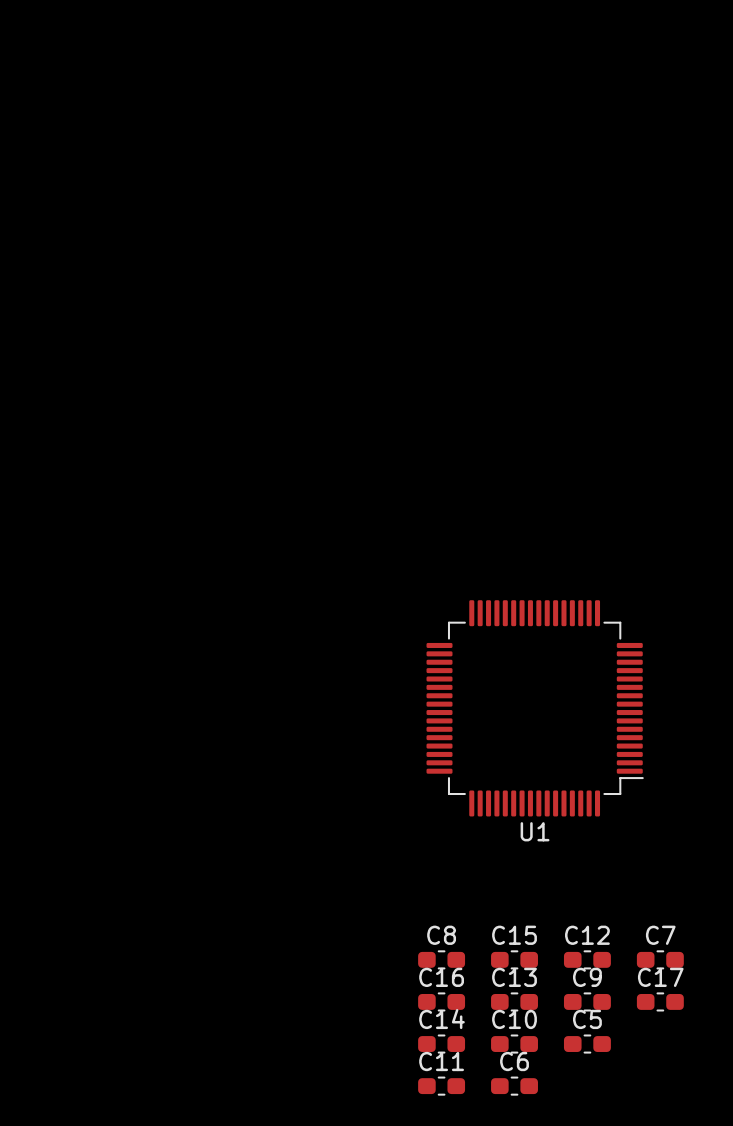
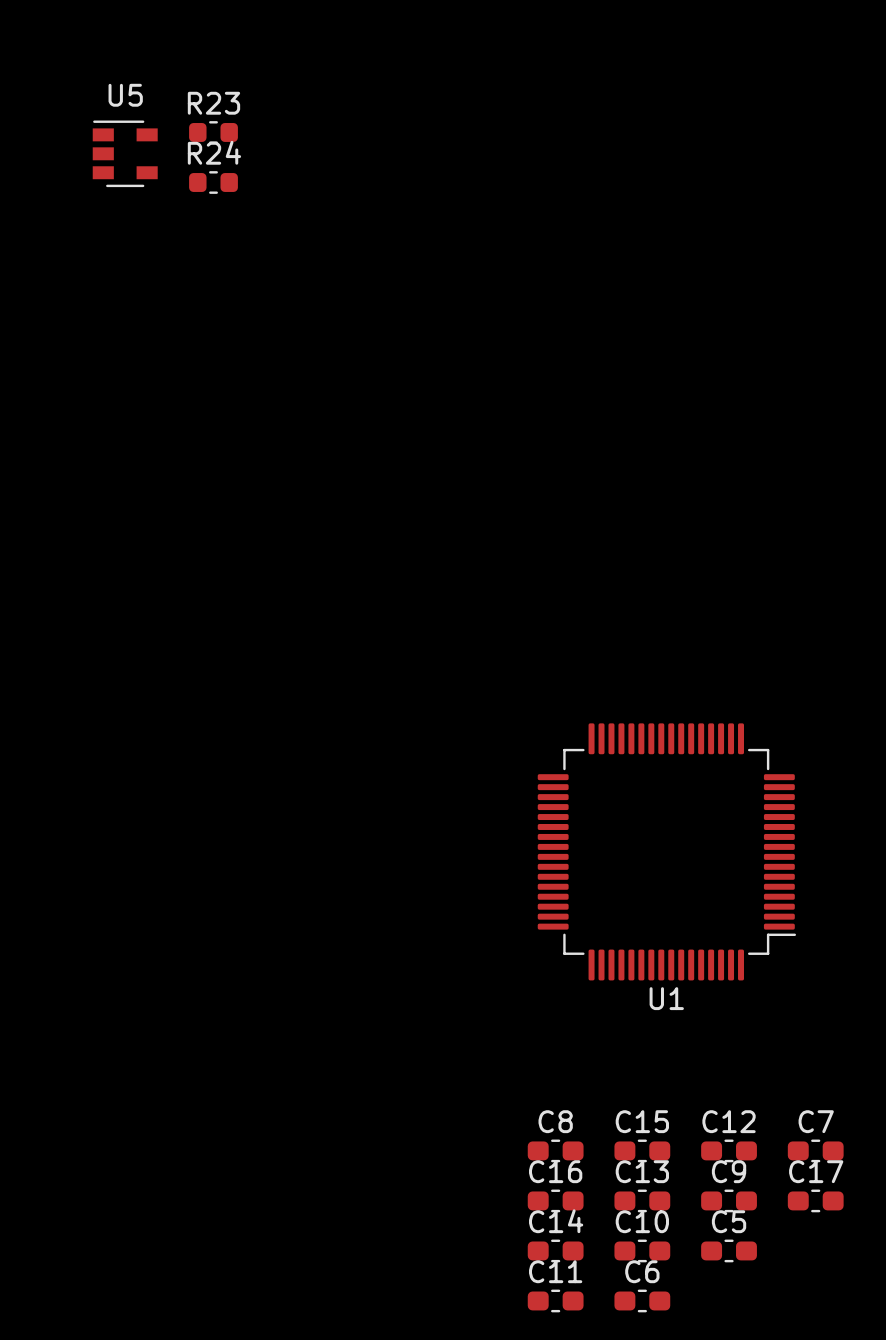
R23: none -> (213, 132)
U5: none -> (125, 153)
R24: none -> (213, 182)

